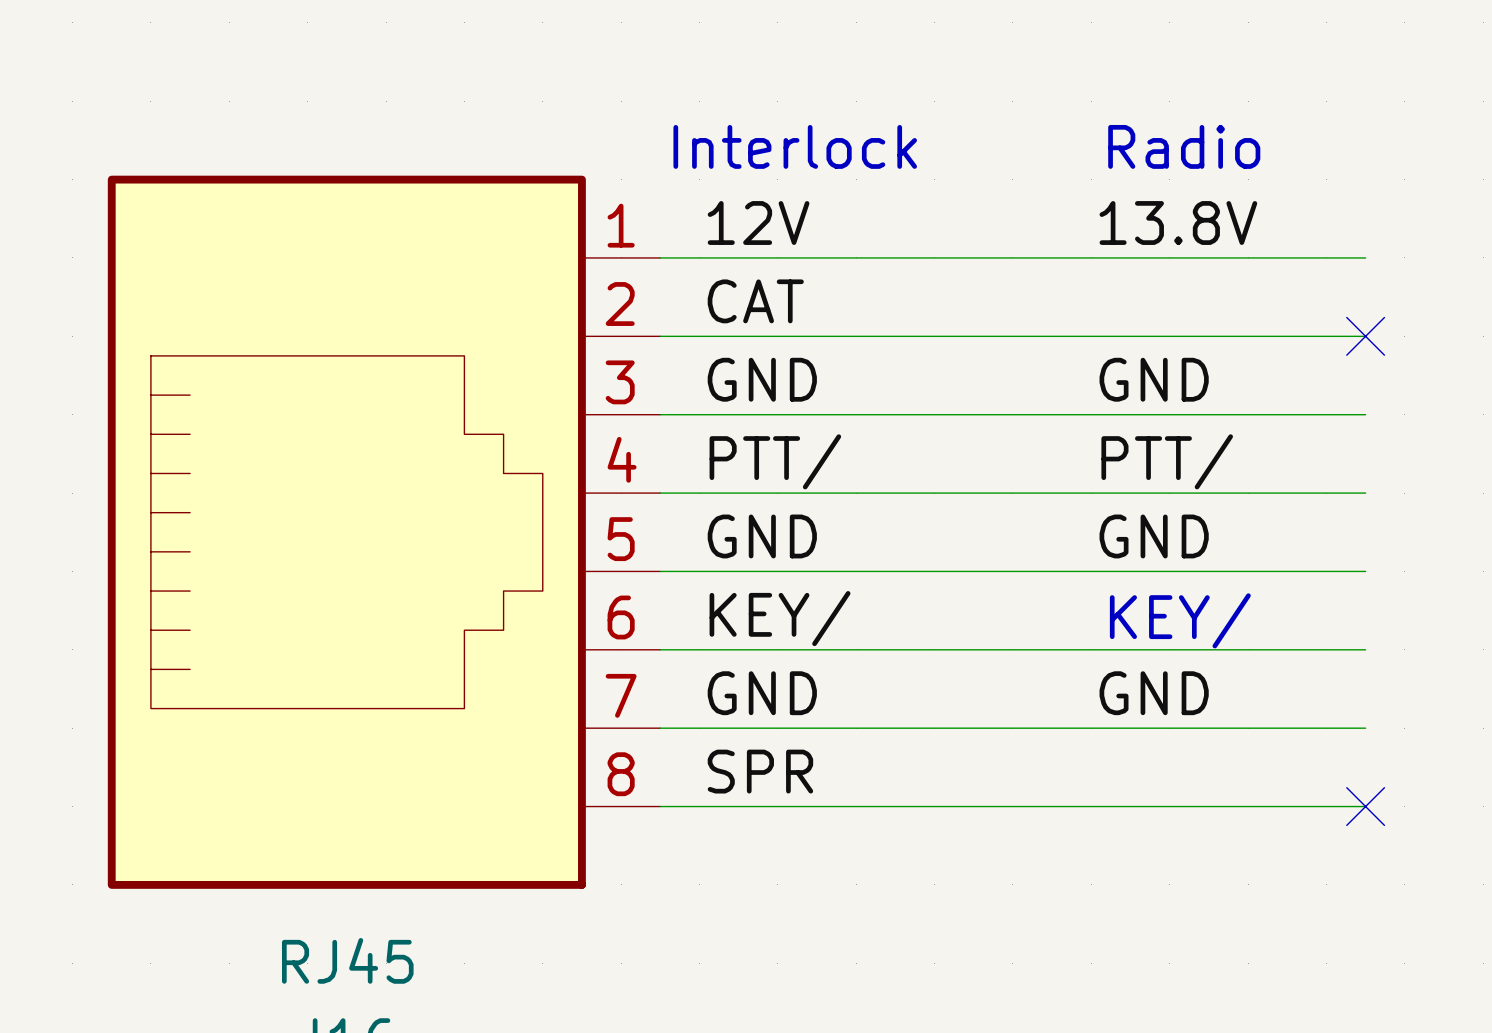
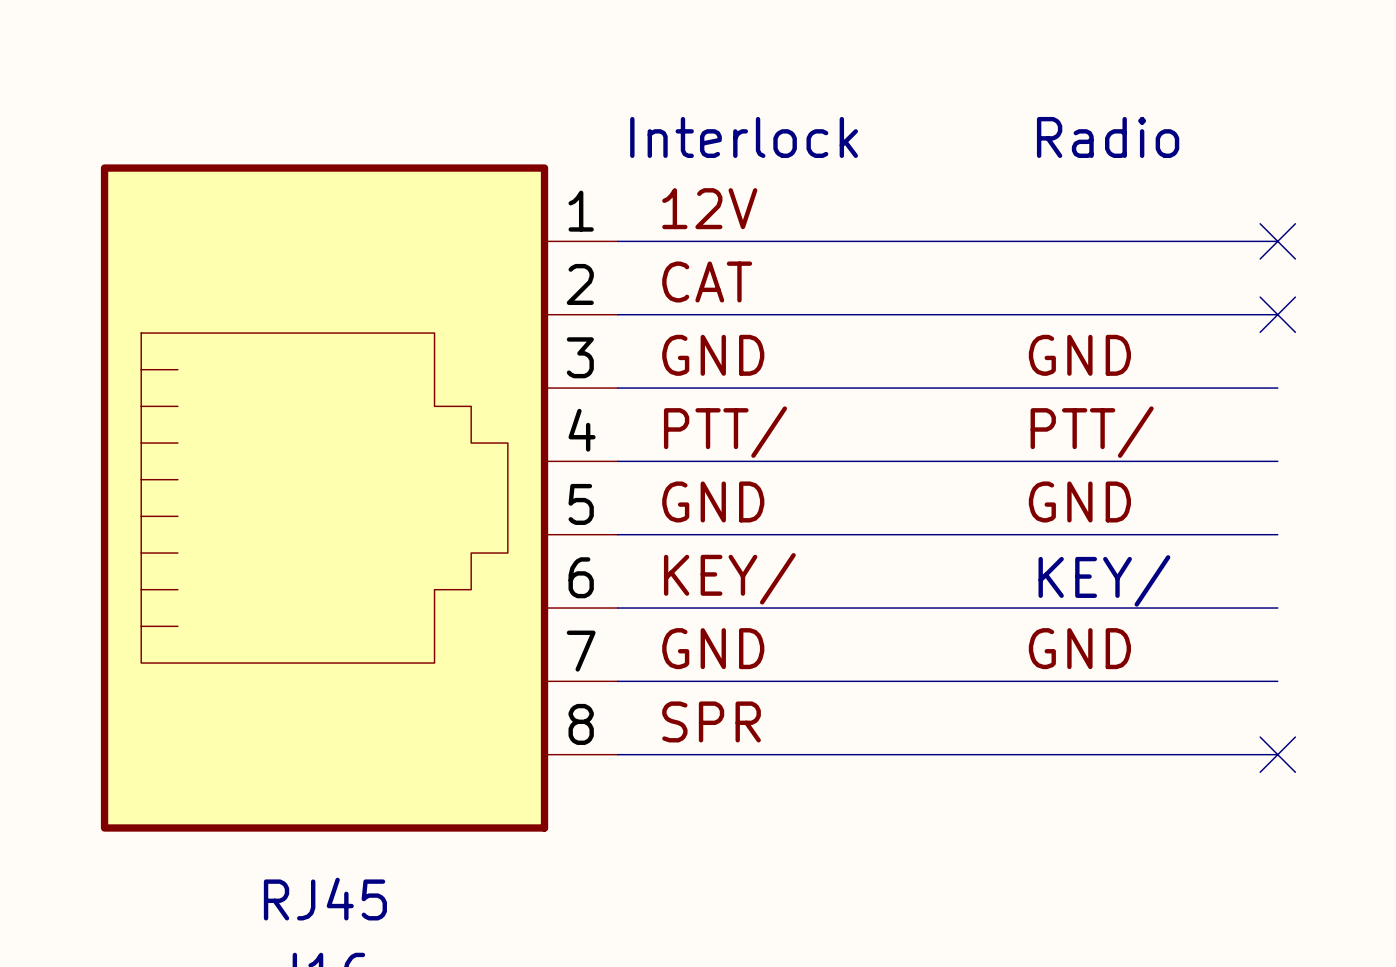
label: 13.8V (1178, 223) -> none
no-connect mark: none -> (1277, 241)

